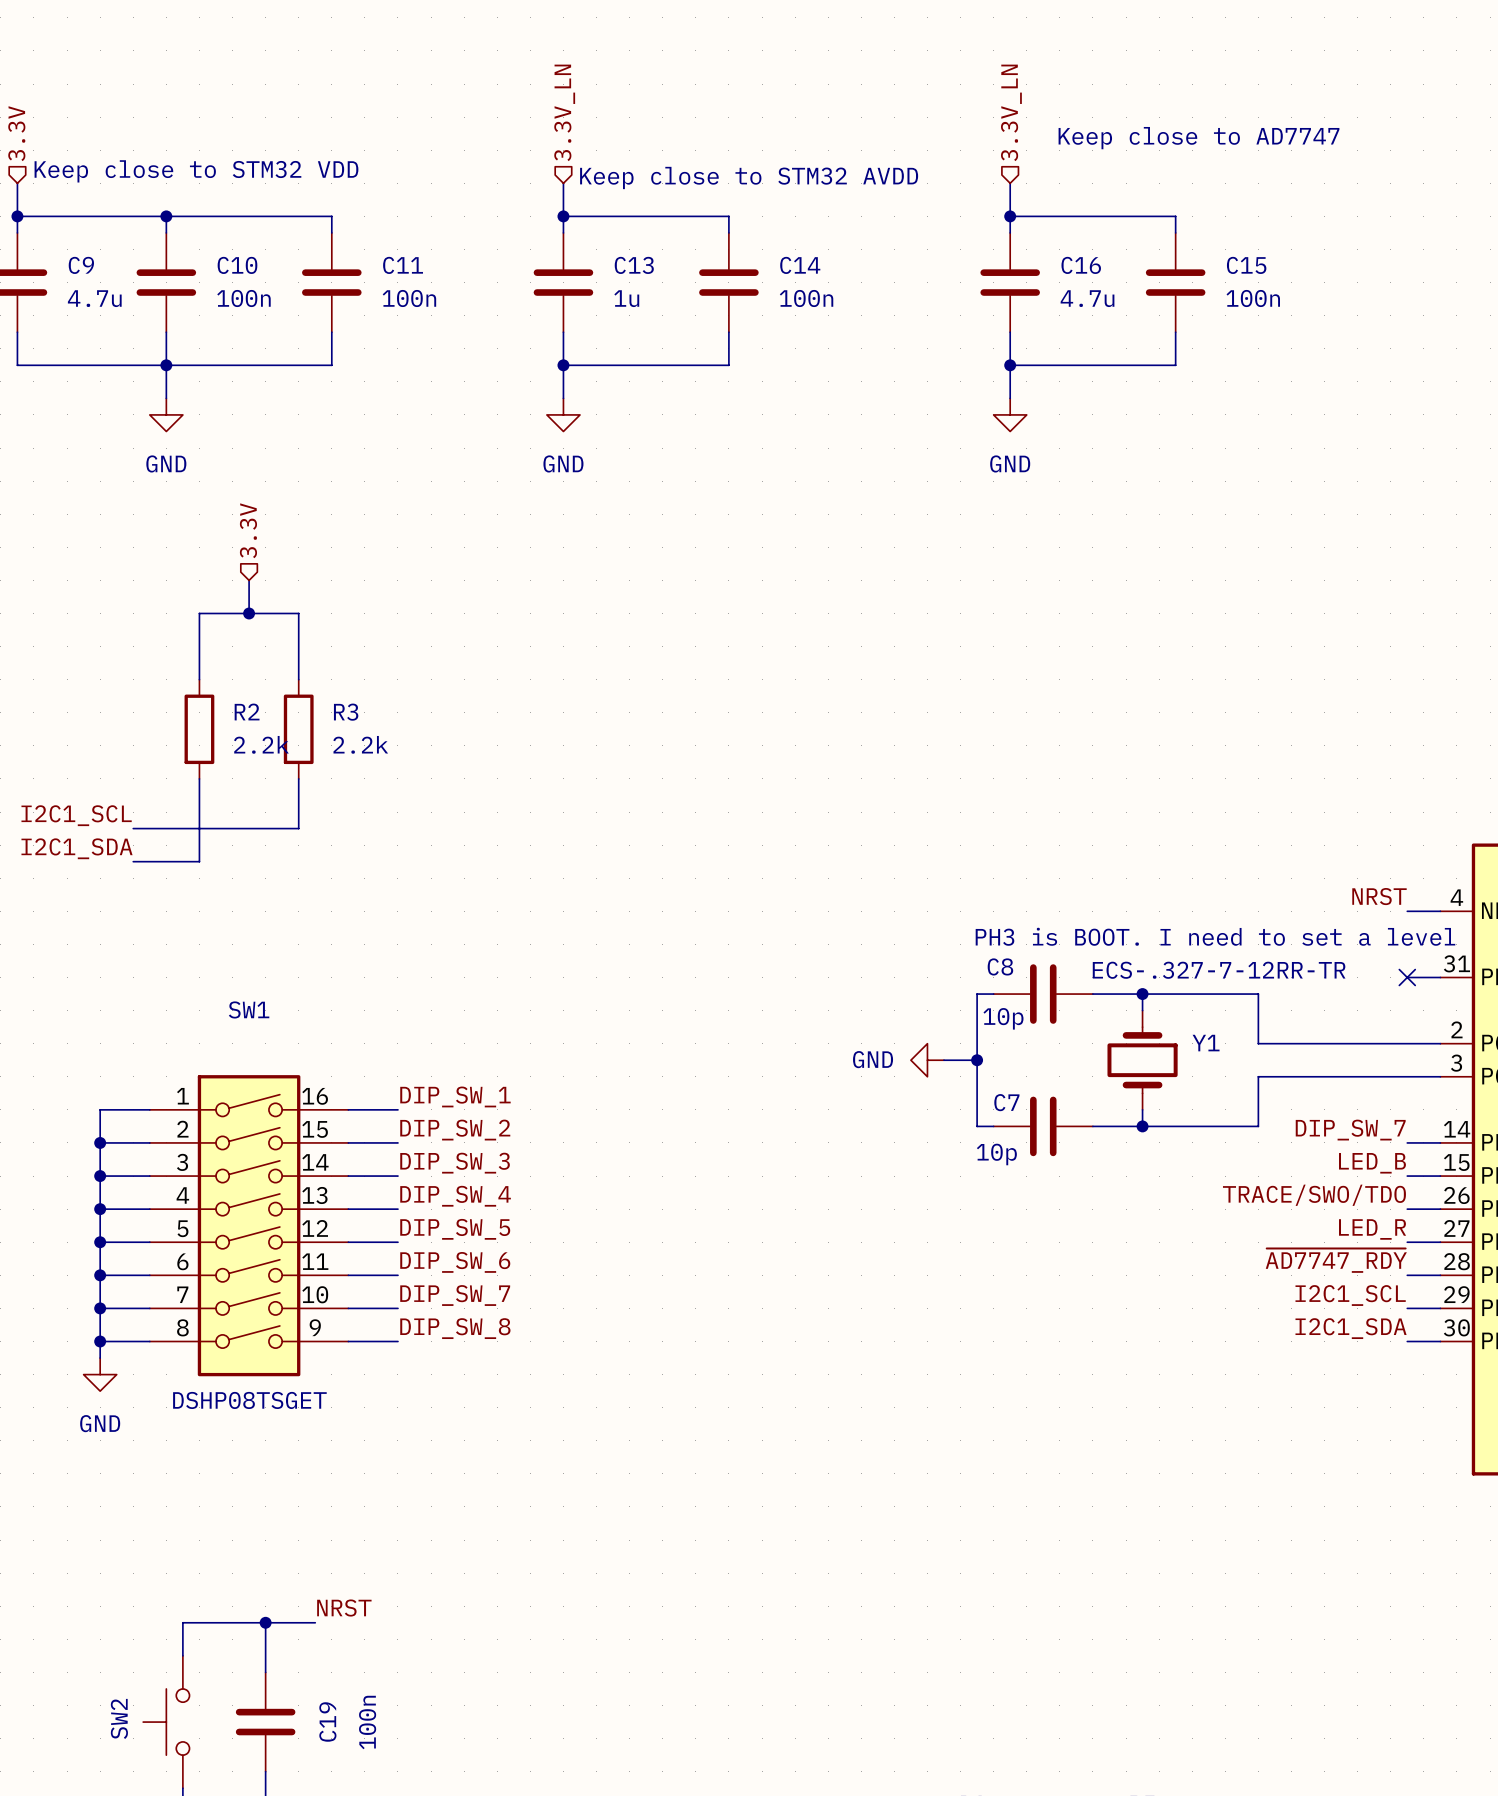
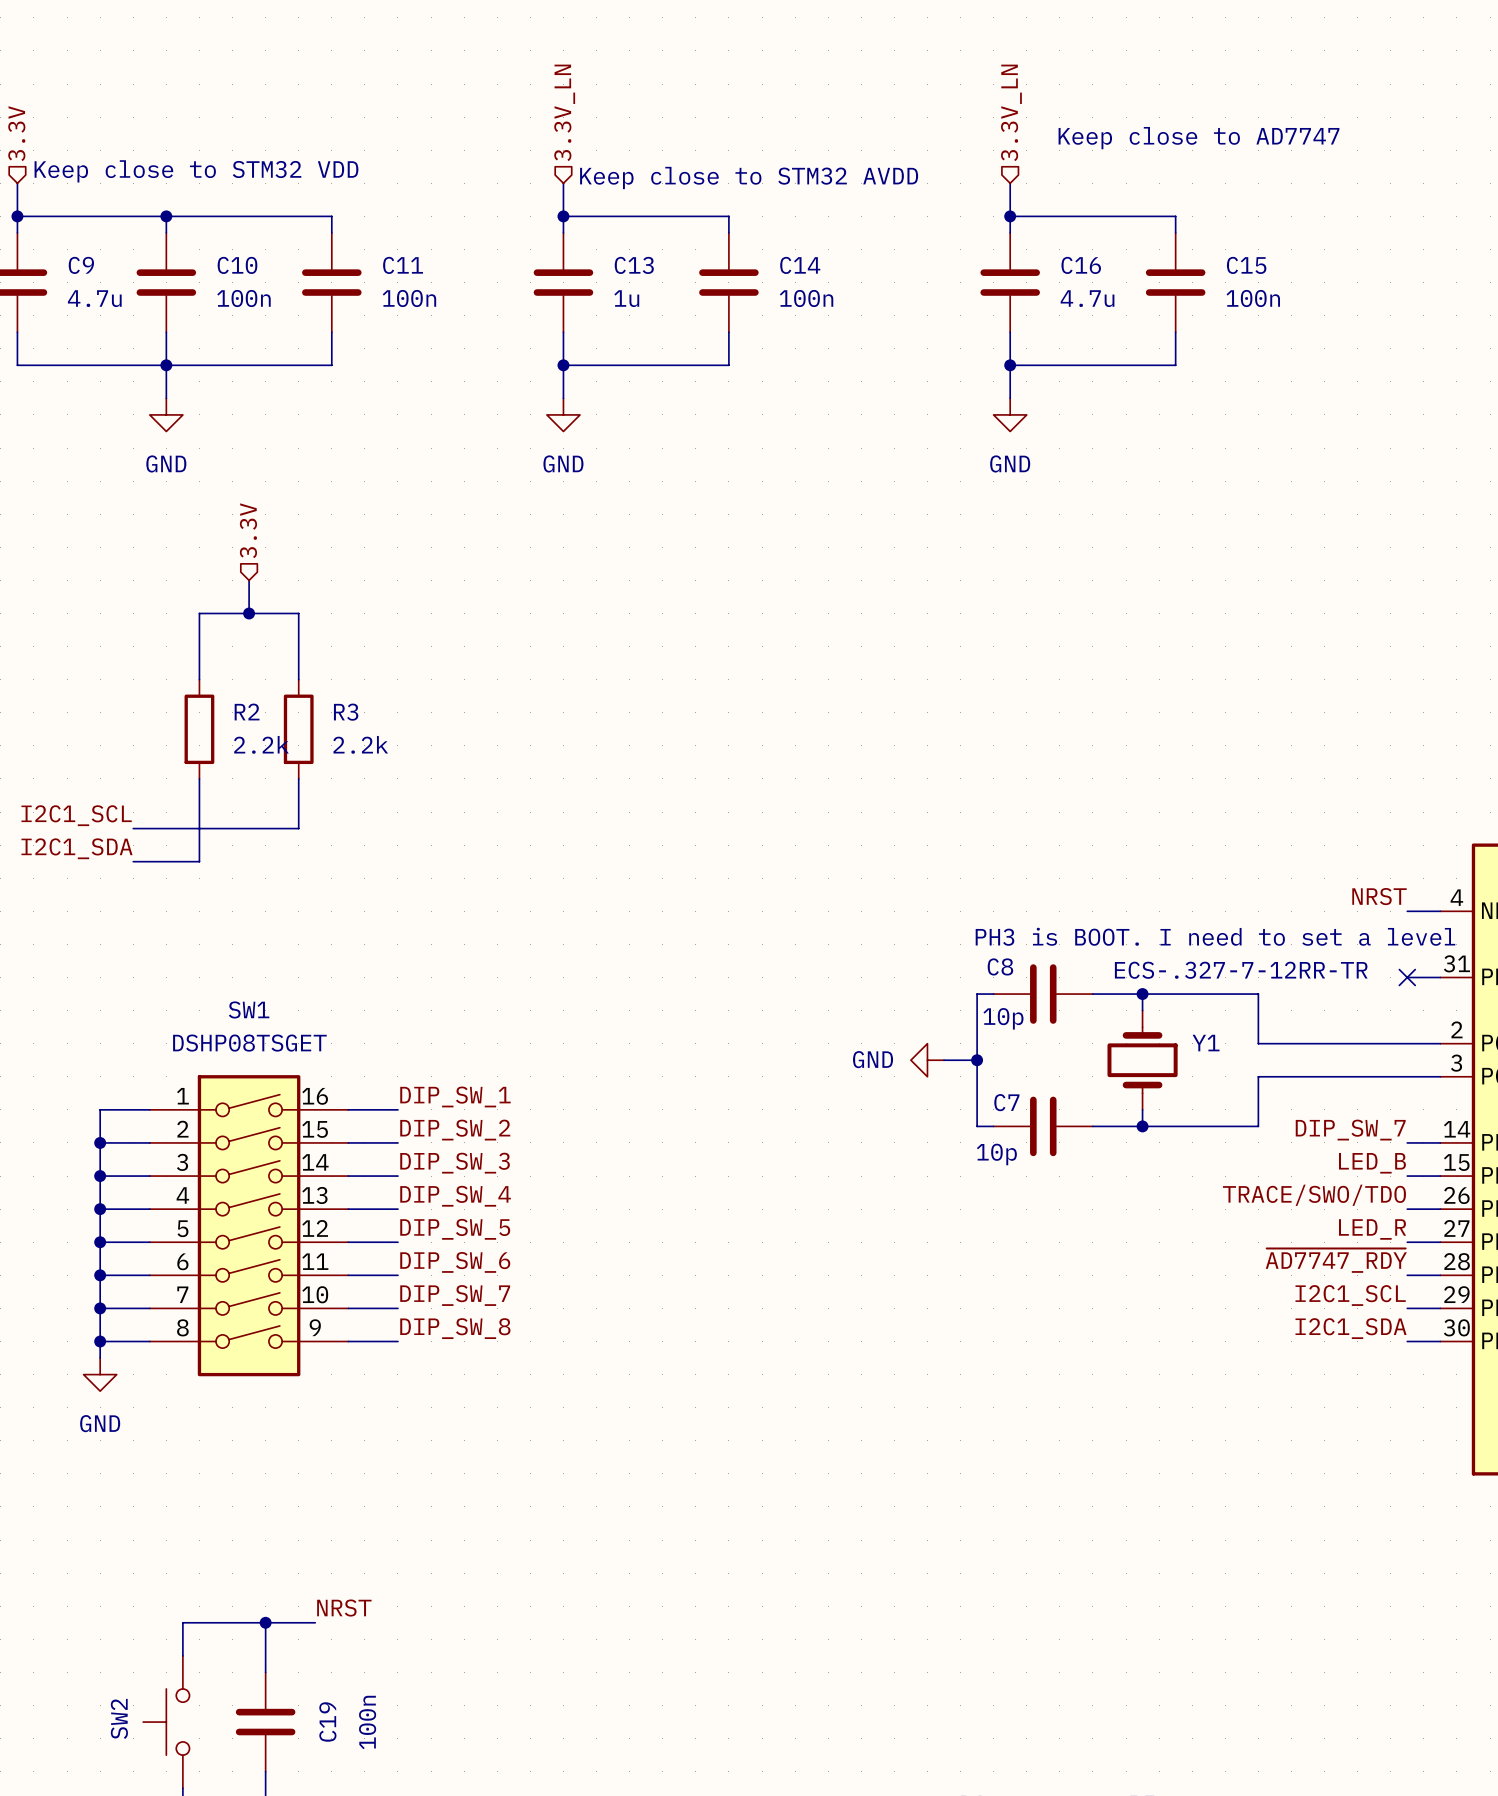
Y1 text: ECS-.327-7-12RR-TR (1219, 970) -> none
Y1 value: none -> ECS-.327-7-12RR-TR (1241, 970)
SW1 value: none -> DSHP08TSGET (249, 1043)
SW1 text: DSHP08TSGET (249, 1400) -> none

